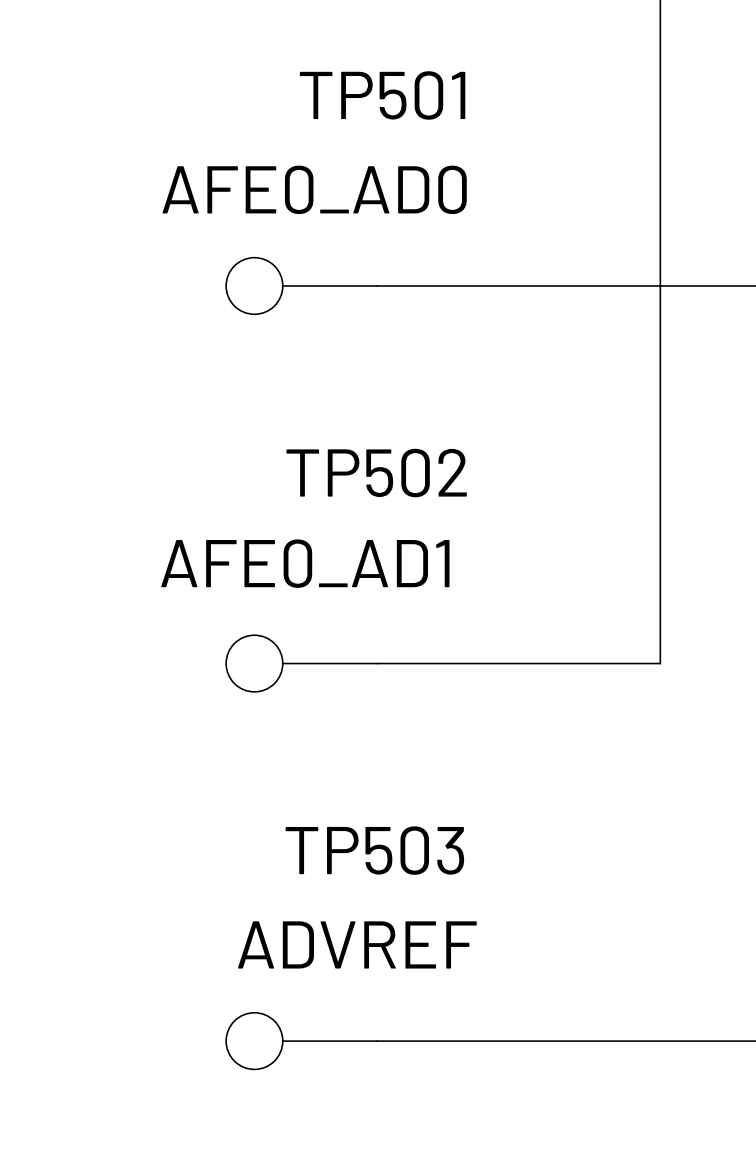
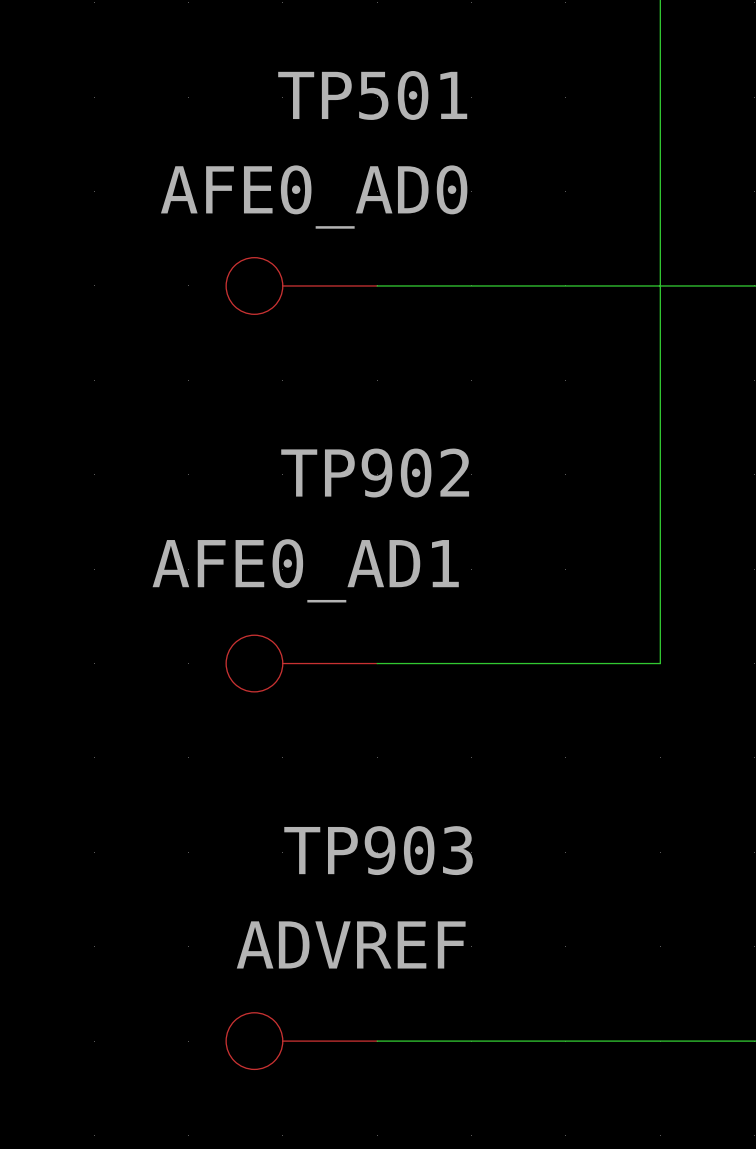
TP502 name: TP502 (376, 473) -> TP902 (375, 473)
TP503 name: TP503 (374, 850) -> TP903 (378, 850)

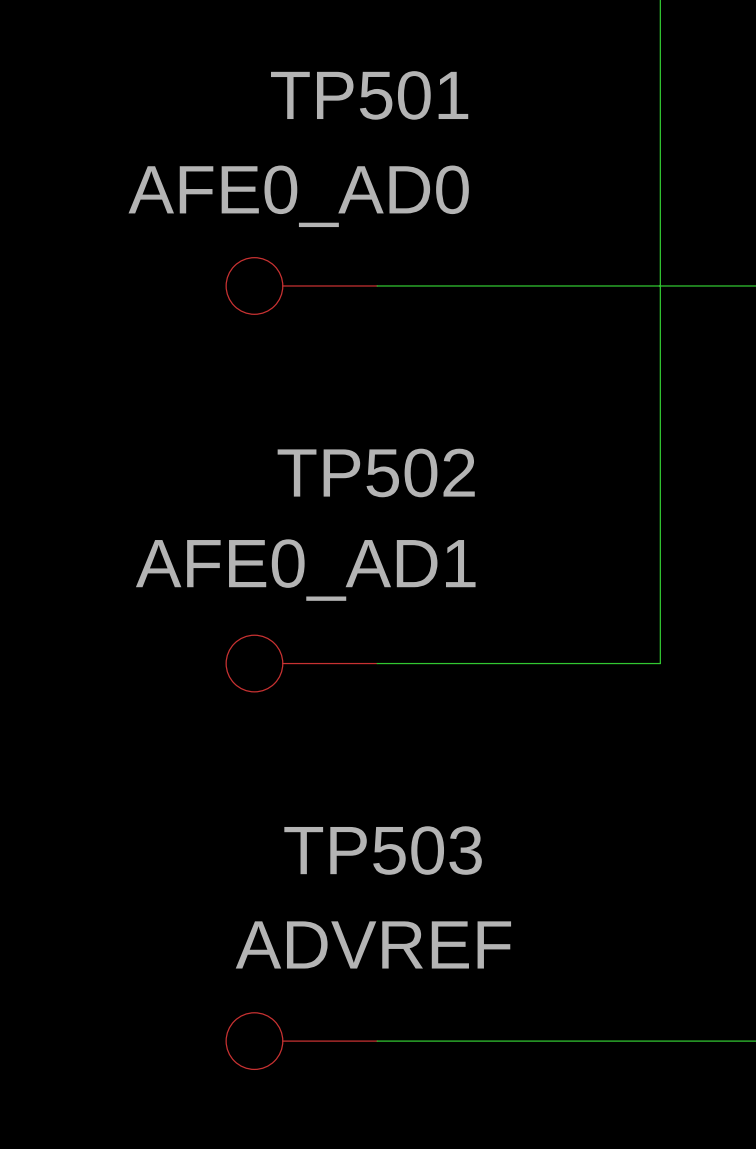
TP902 name: TP902 (375, 473) -> TP502 (376, 472)
TP903 name: TP903 (378, 850) -> TP503 (383, 850)

